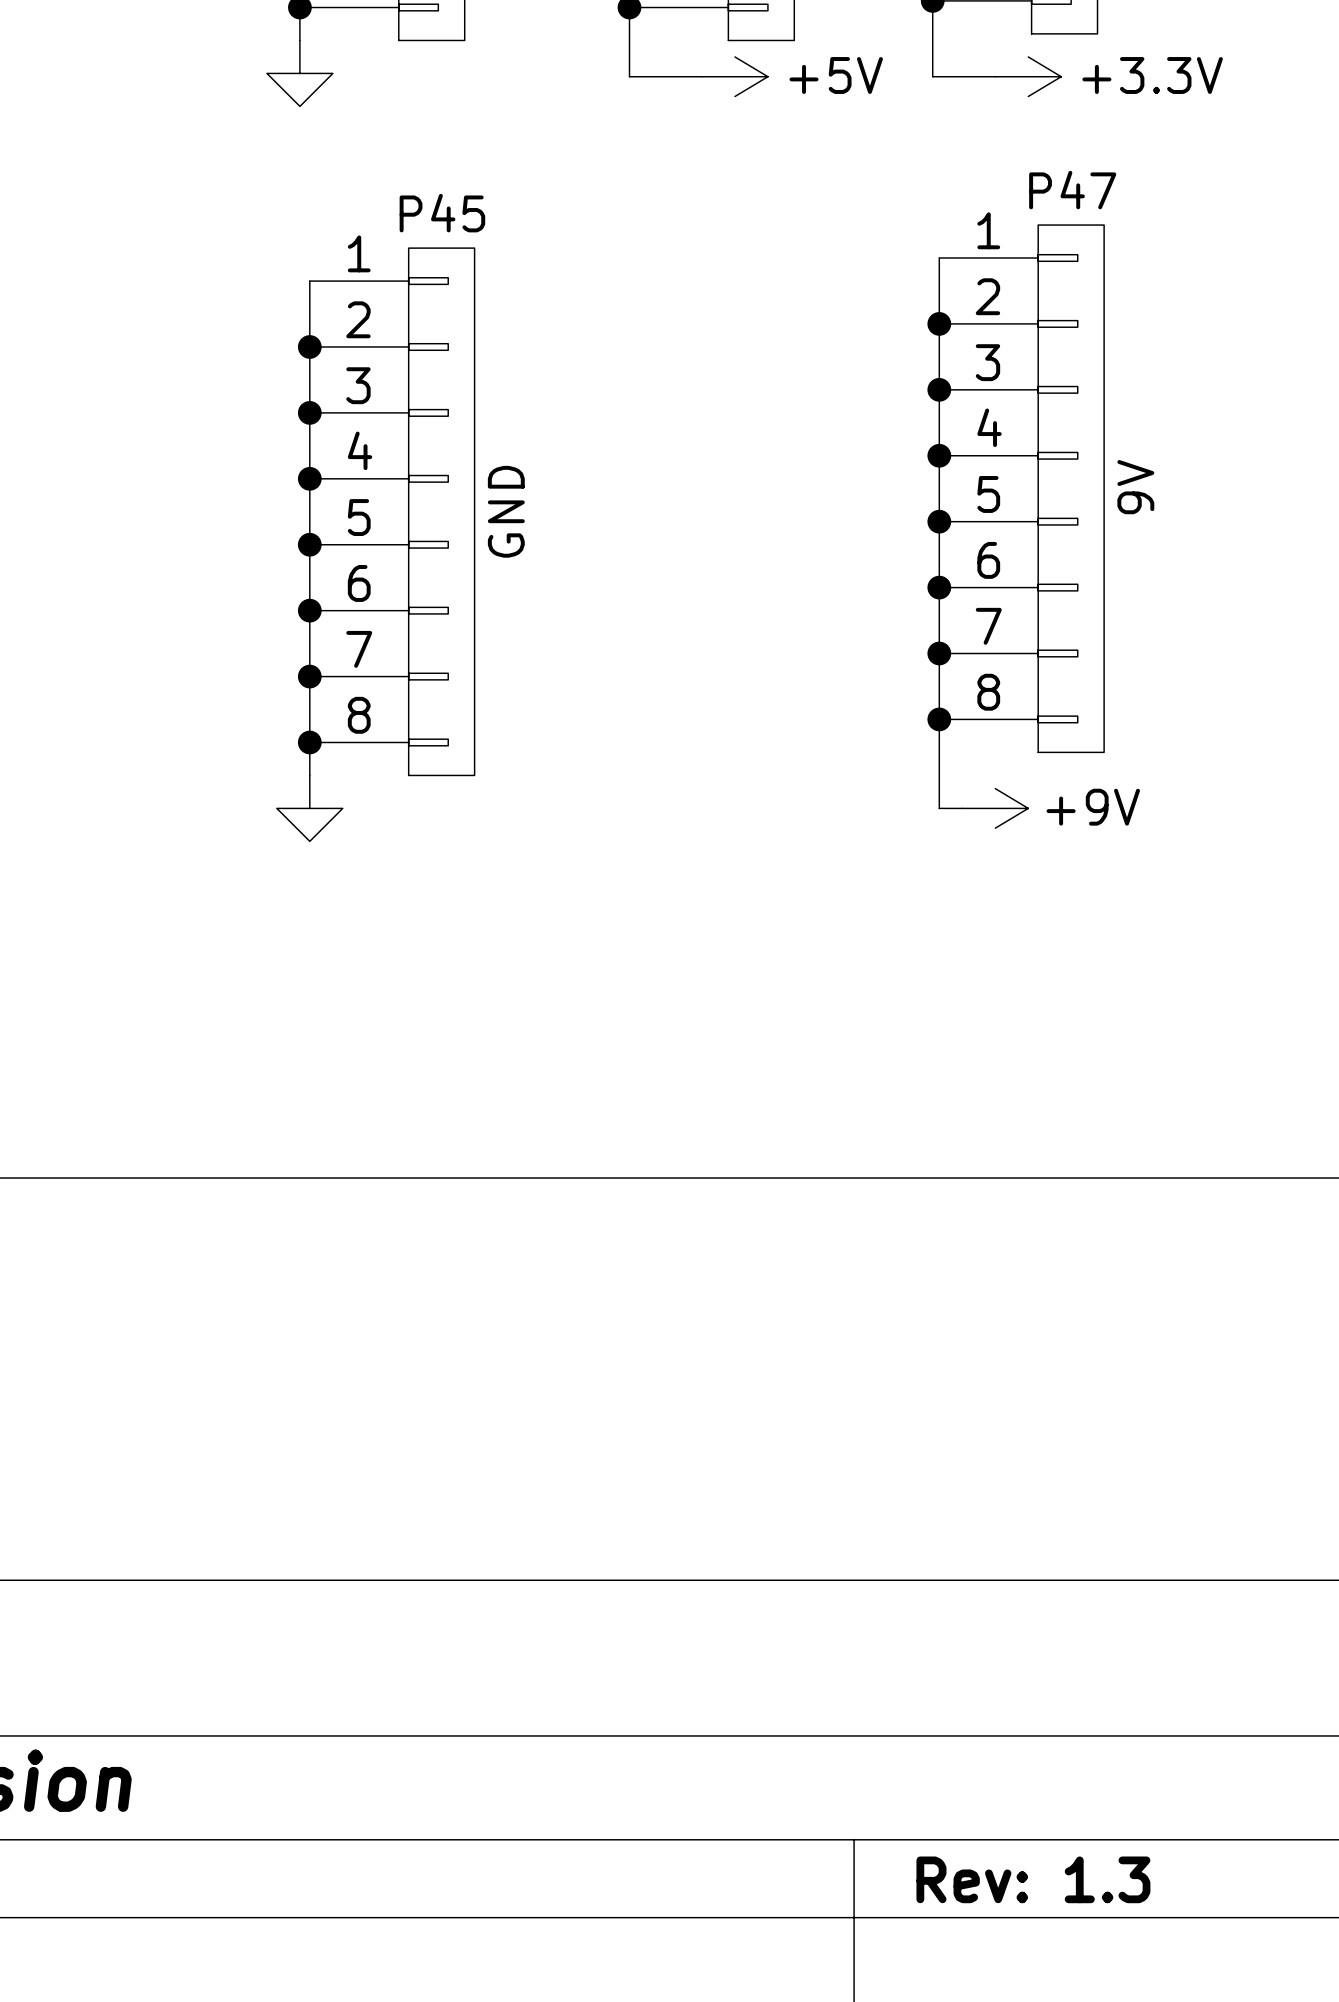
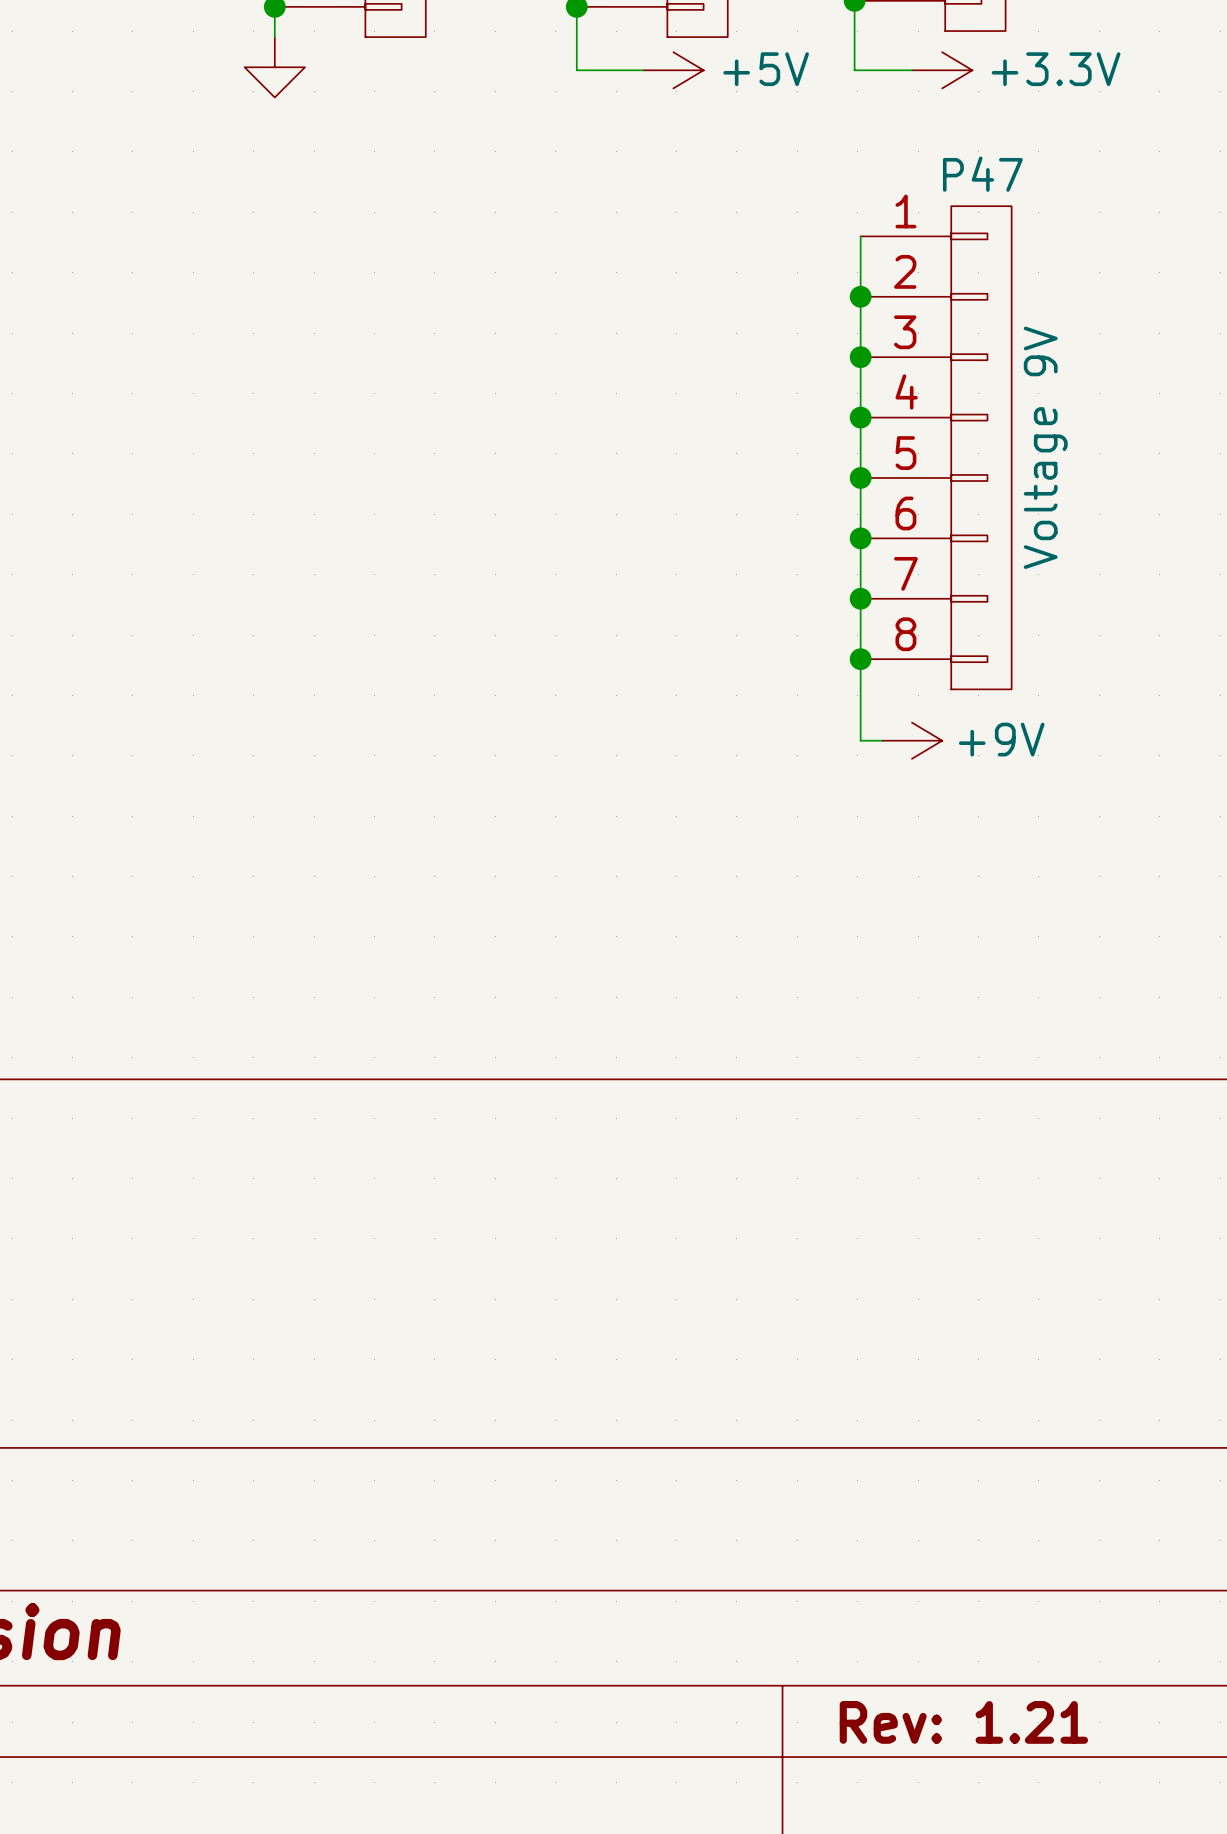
wire: (309, 281) (309, 775) -> none
junction: (309, 346) -> none
junction: (309, 412) -> none
junction: (309, 478) -> none
P47 value: 9V (1135, 487) -> Voltage 9V (1045, 447)
P45: GND (392, 511) -> none
junction: (309, 544) -> none
junction: (309, 610) -> none
junction: (309, 676) -> none
junction: (309, 742) -> none
power symbol: (309, 808) -> none
title block: Rev: 1.3 (1033, 1879) -> Rev: 1.21 (963, 1722)

